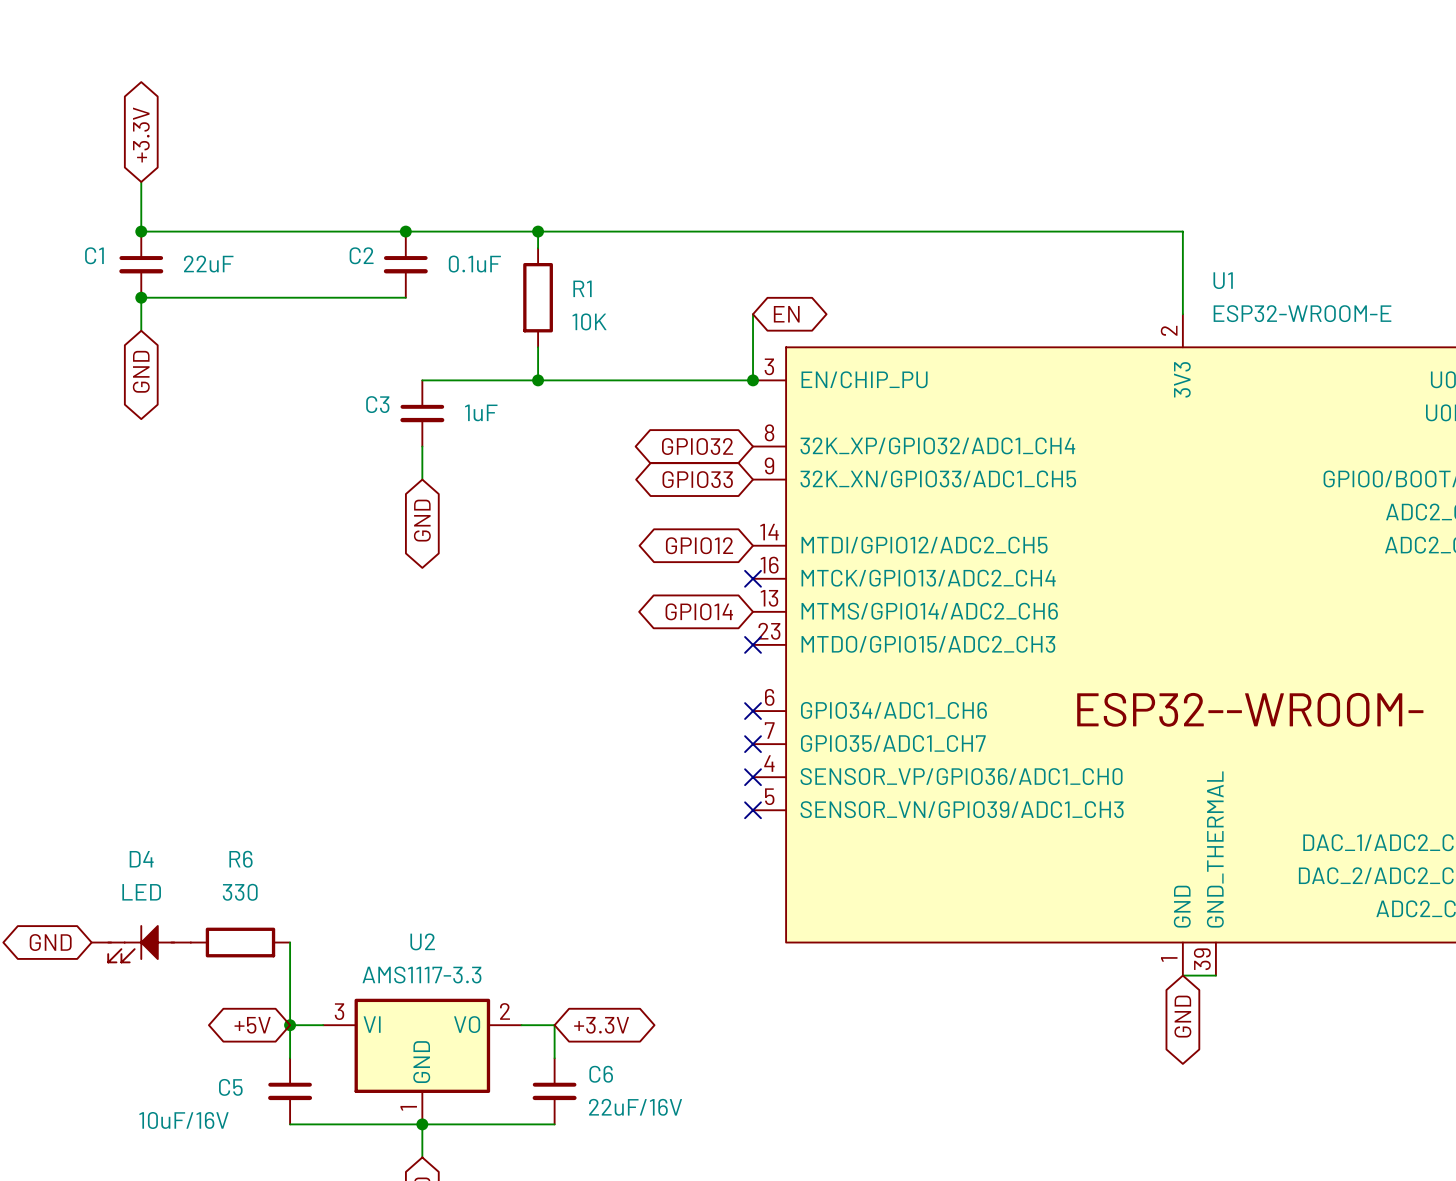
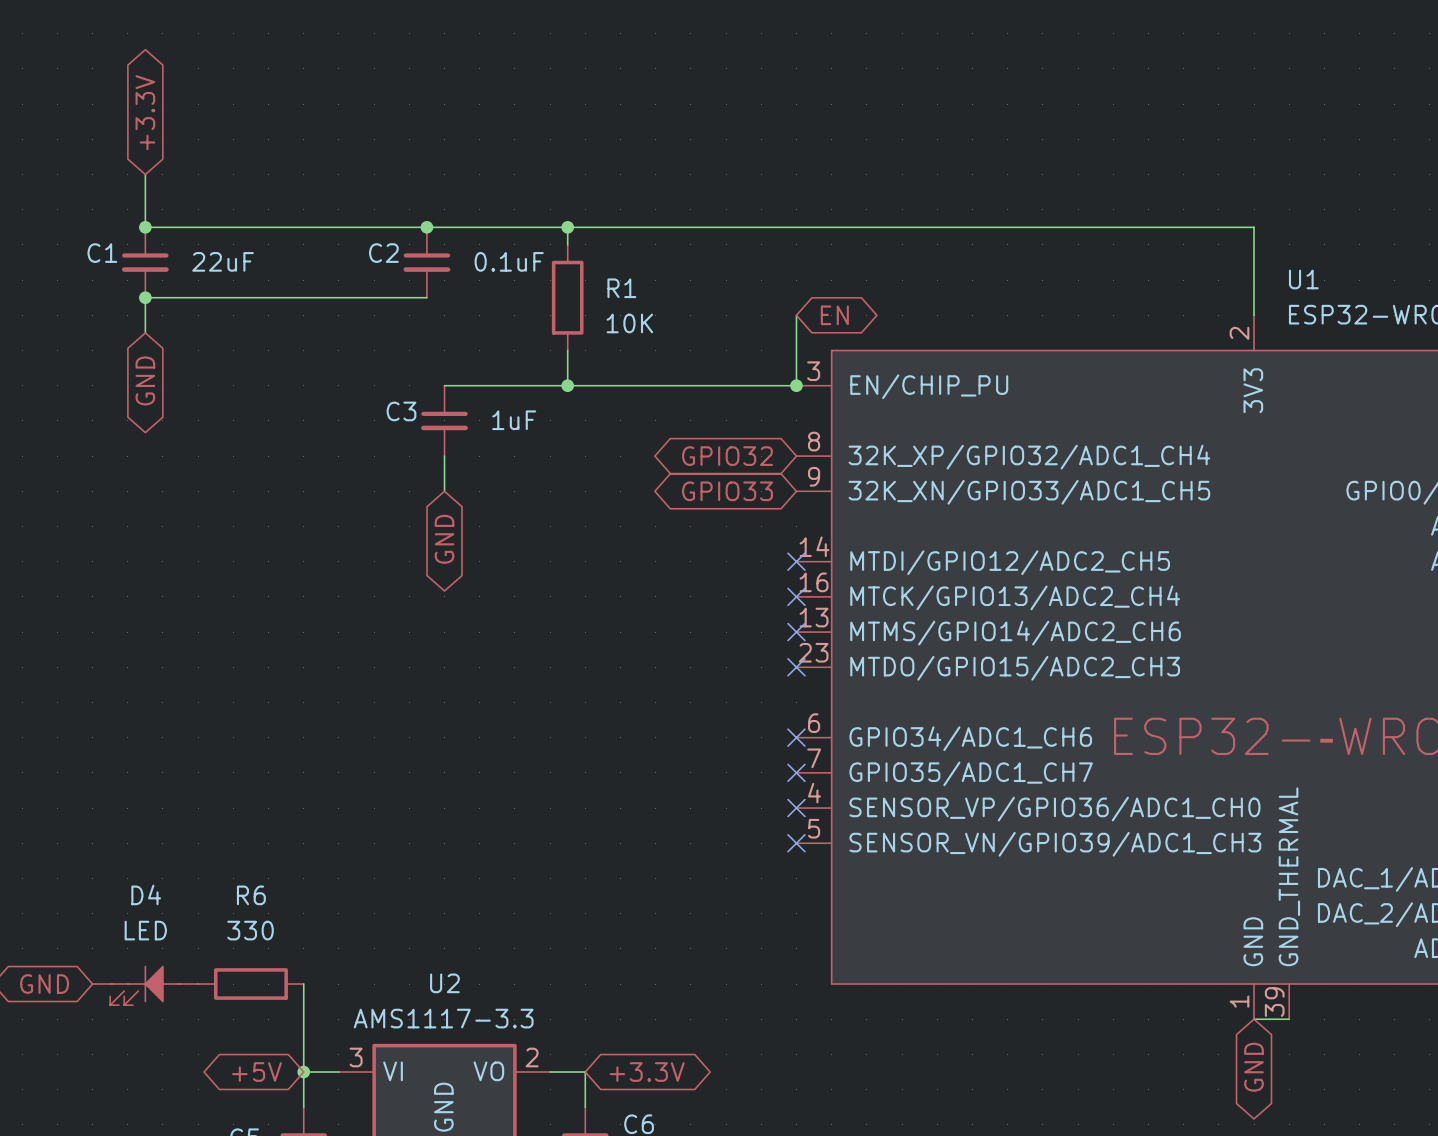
global label: GPIO12 (699, 545) -> none
no-connect mark: none -> (796, 561)
global label: GPIO14 (699, 611) -> none
no-connect mark: none -> (796, 632)

